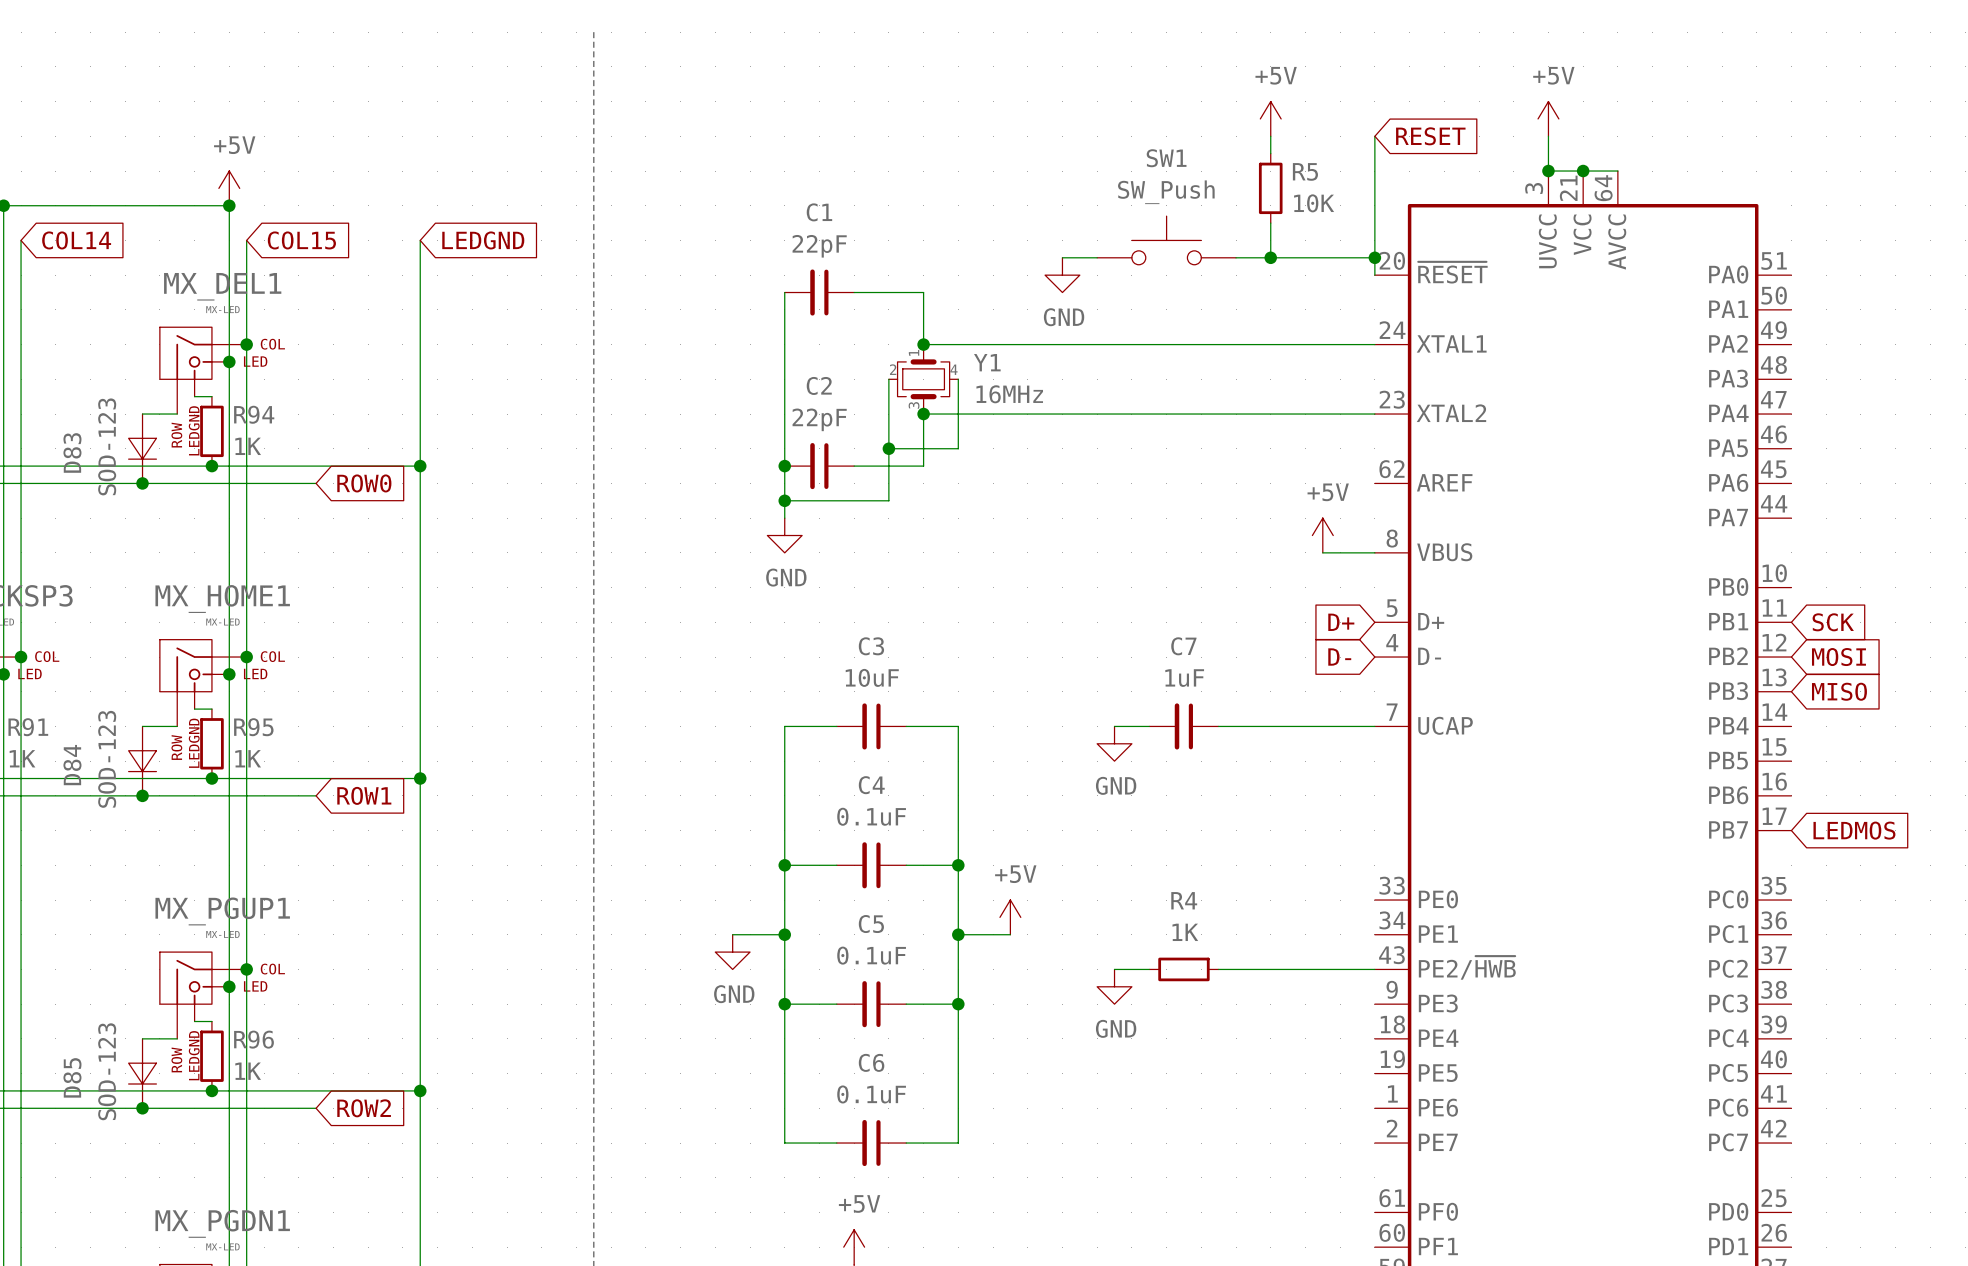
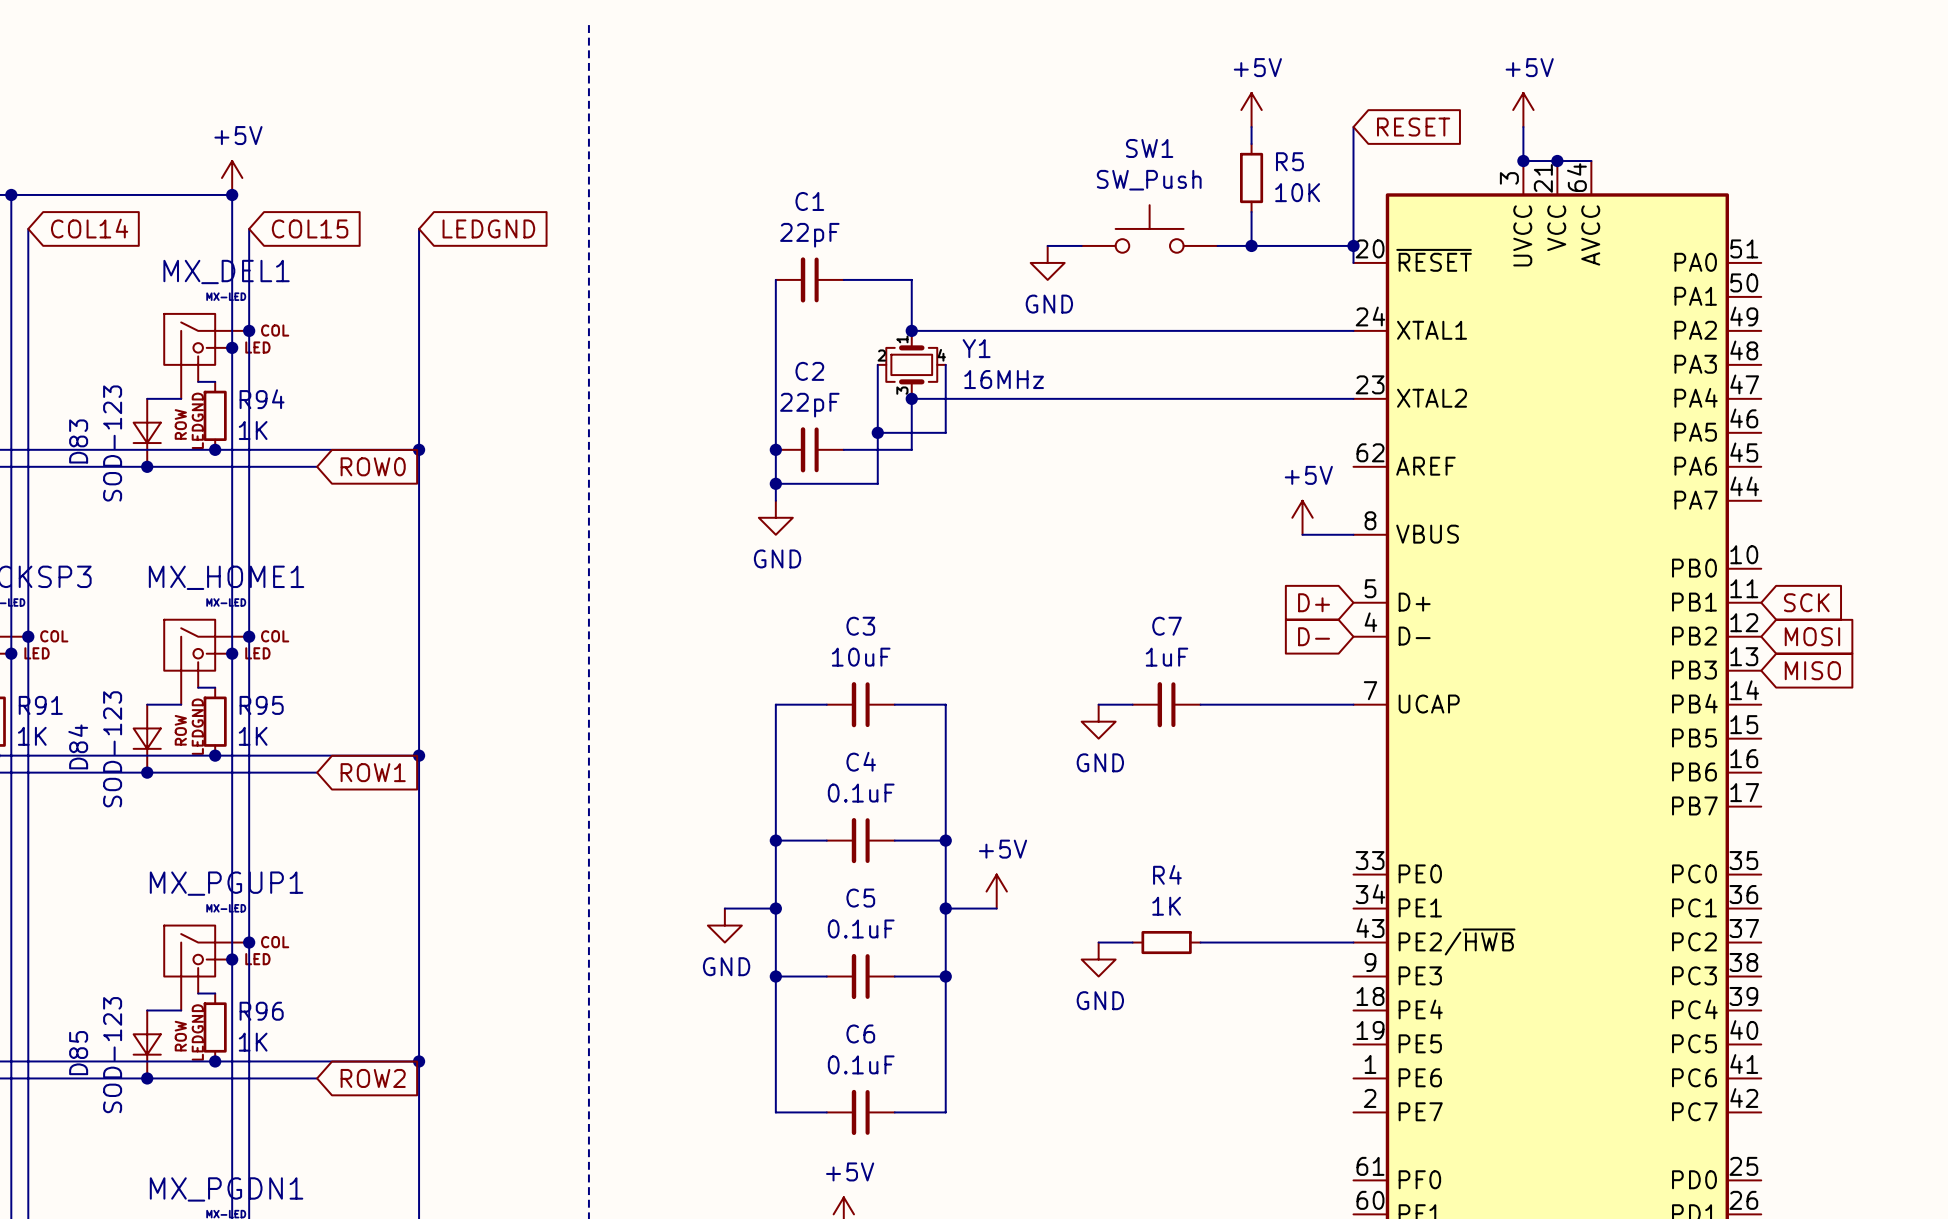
global label: LEDMOS (1854, 830) -> none

